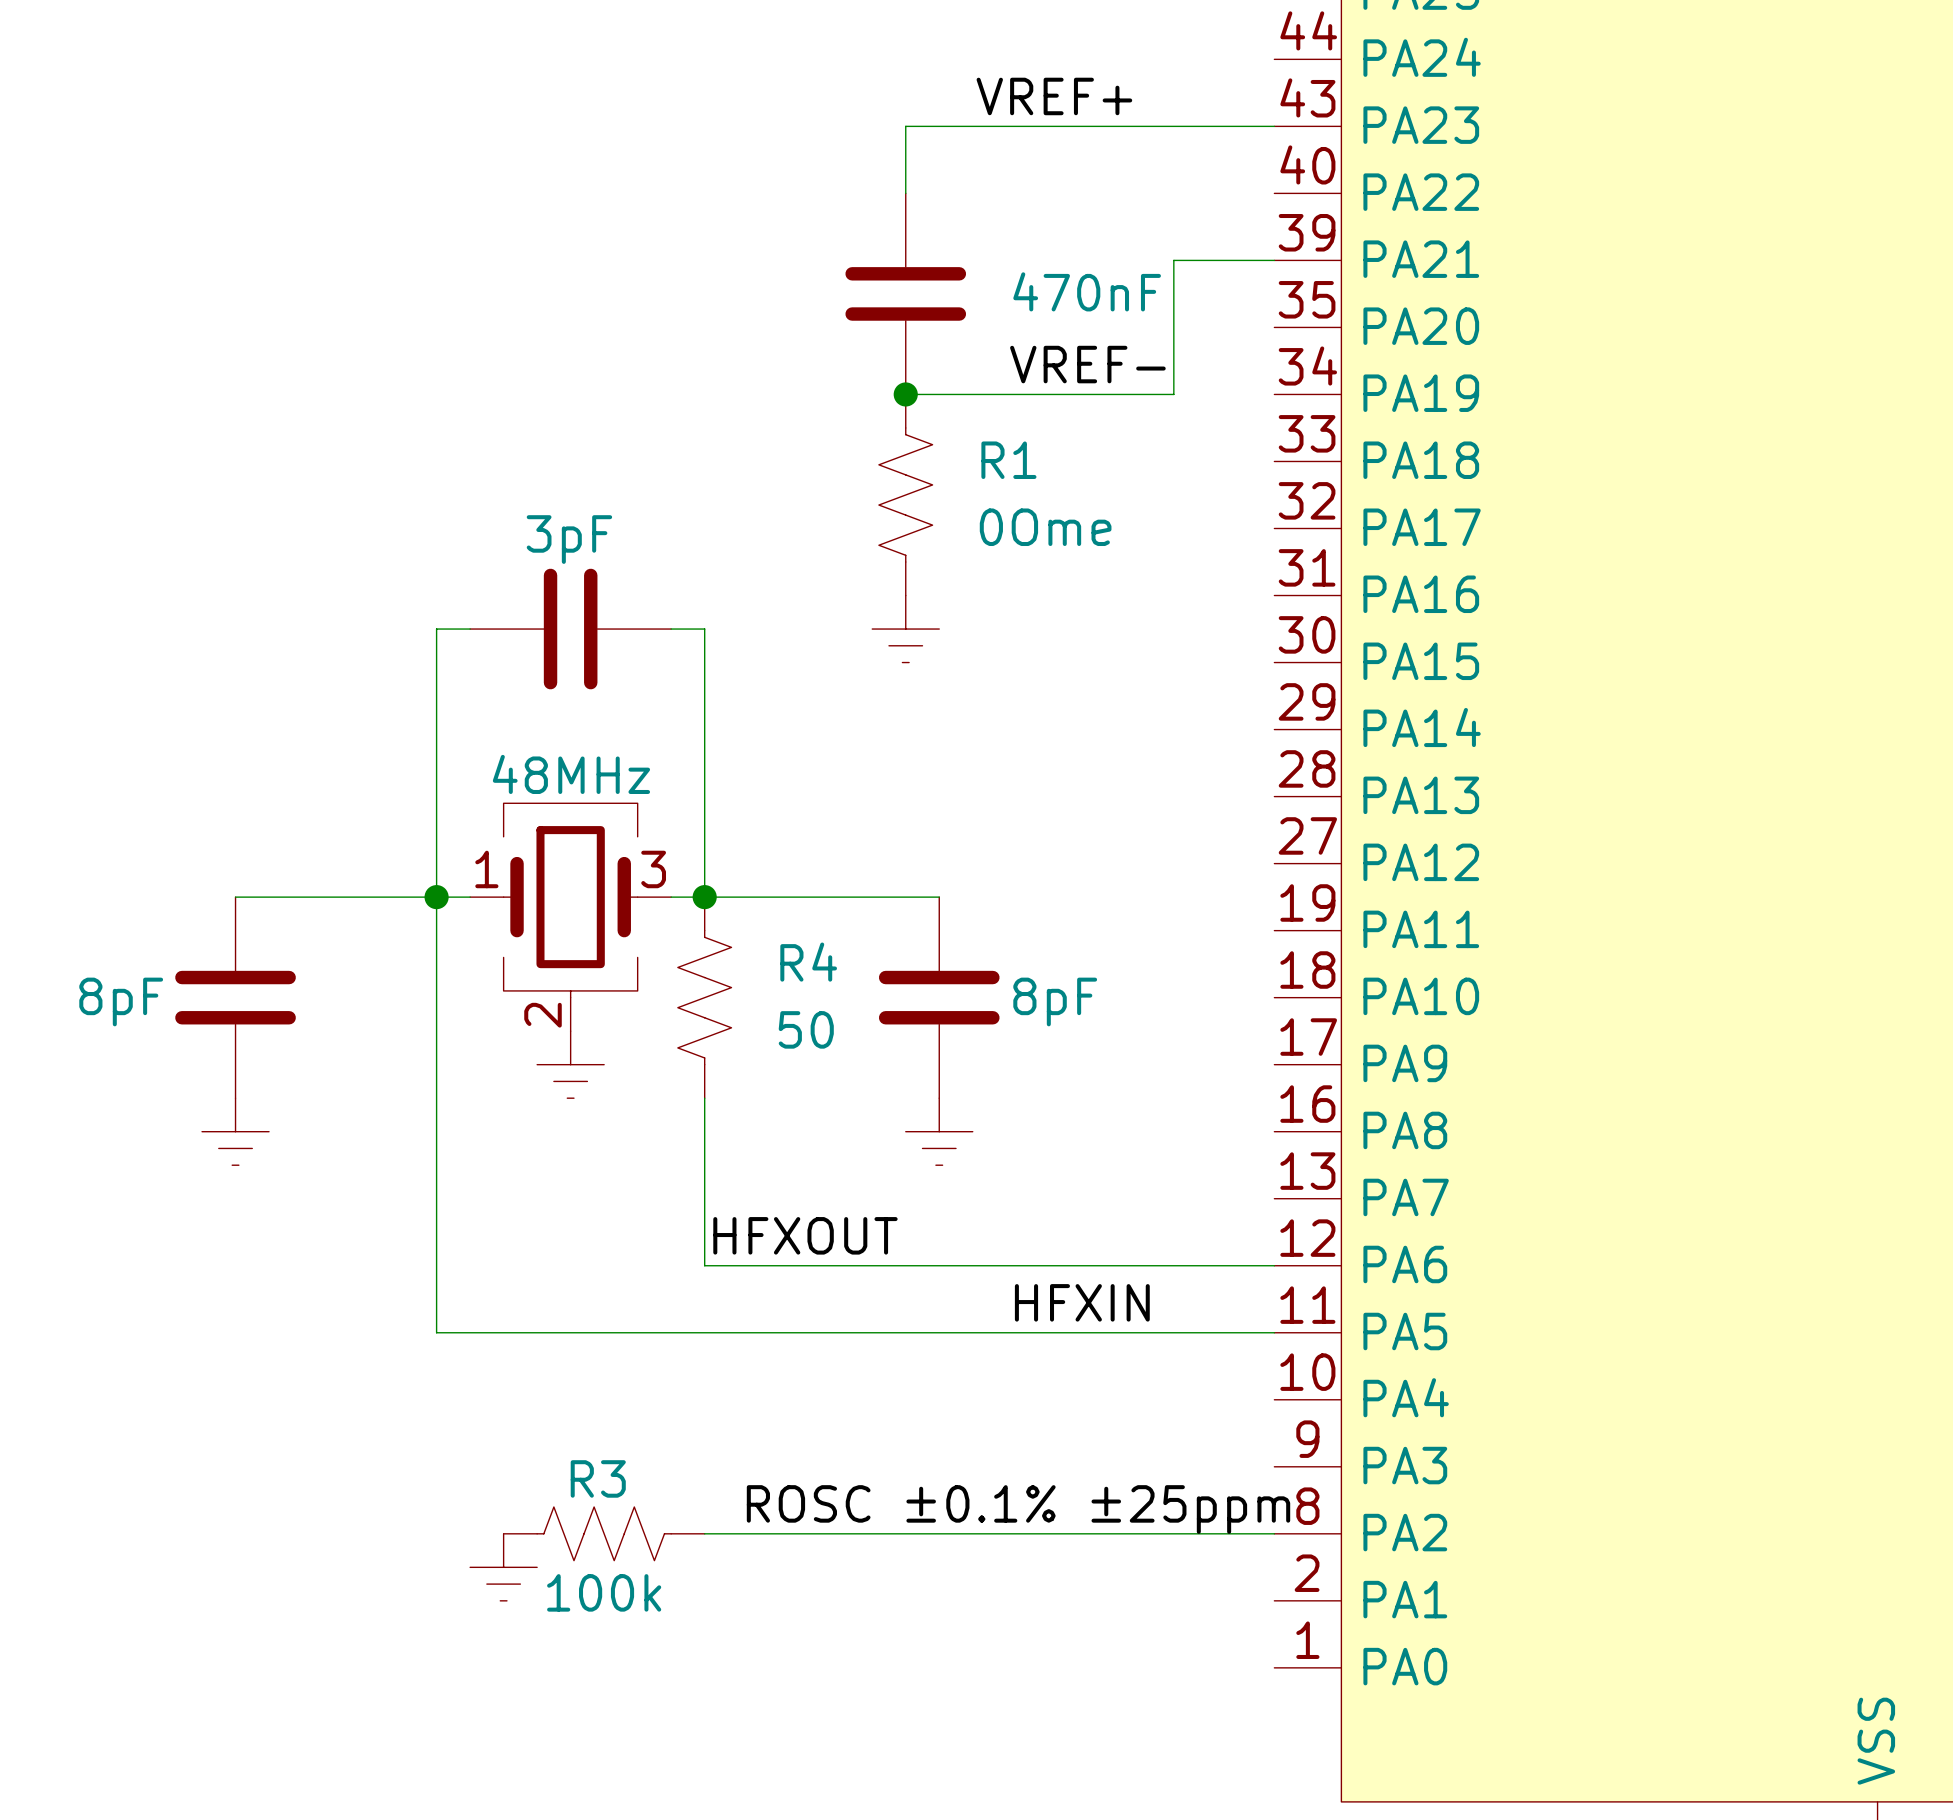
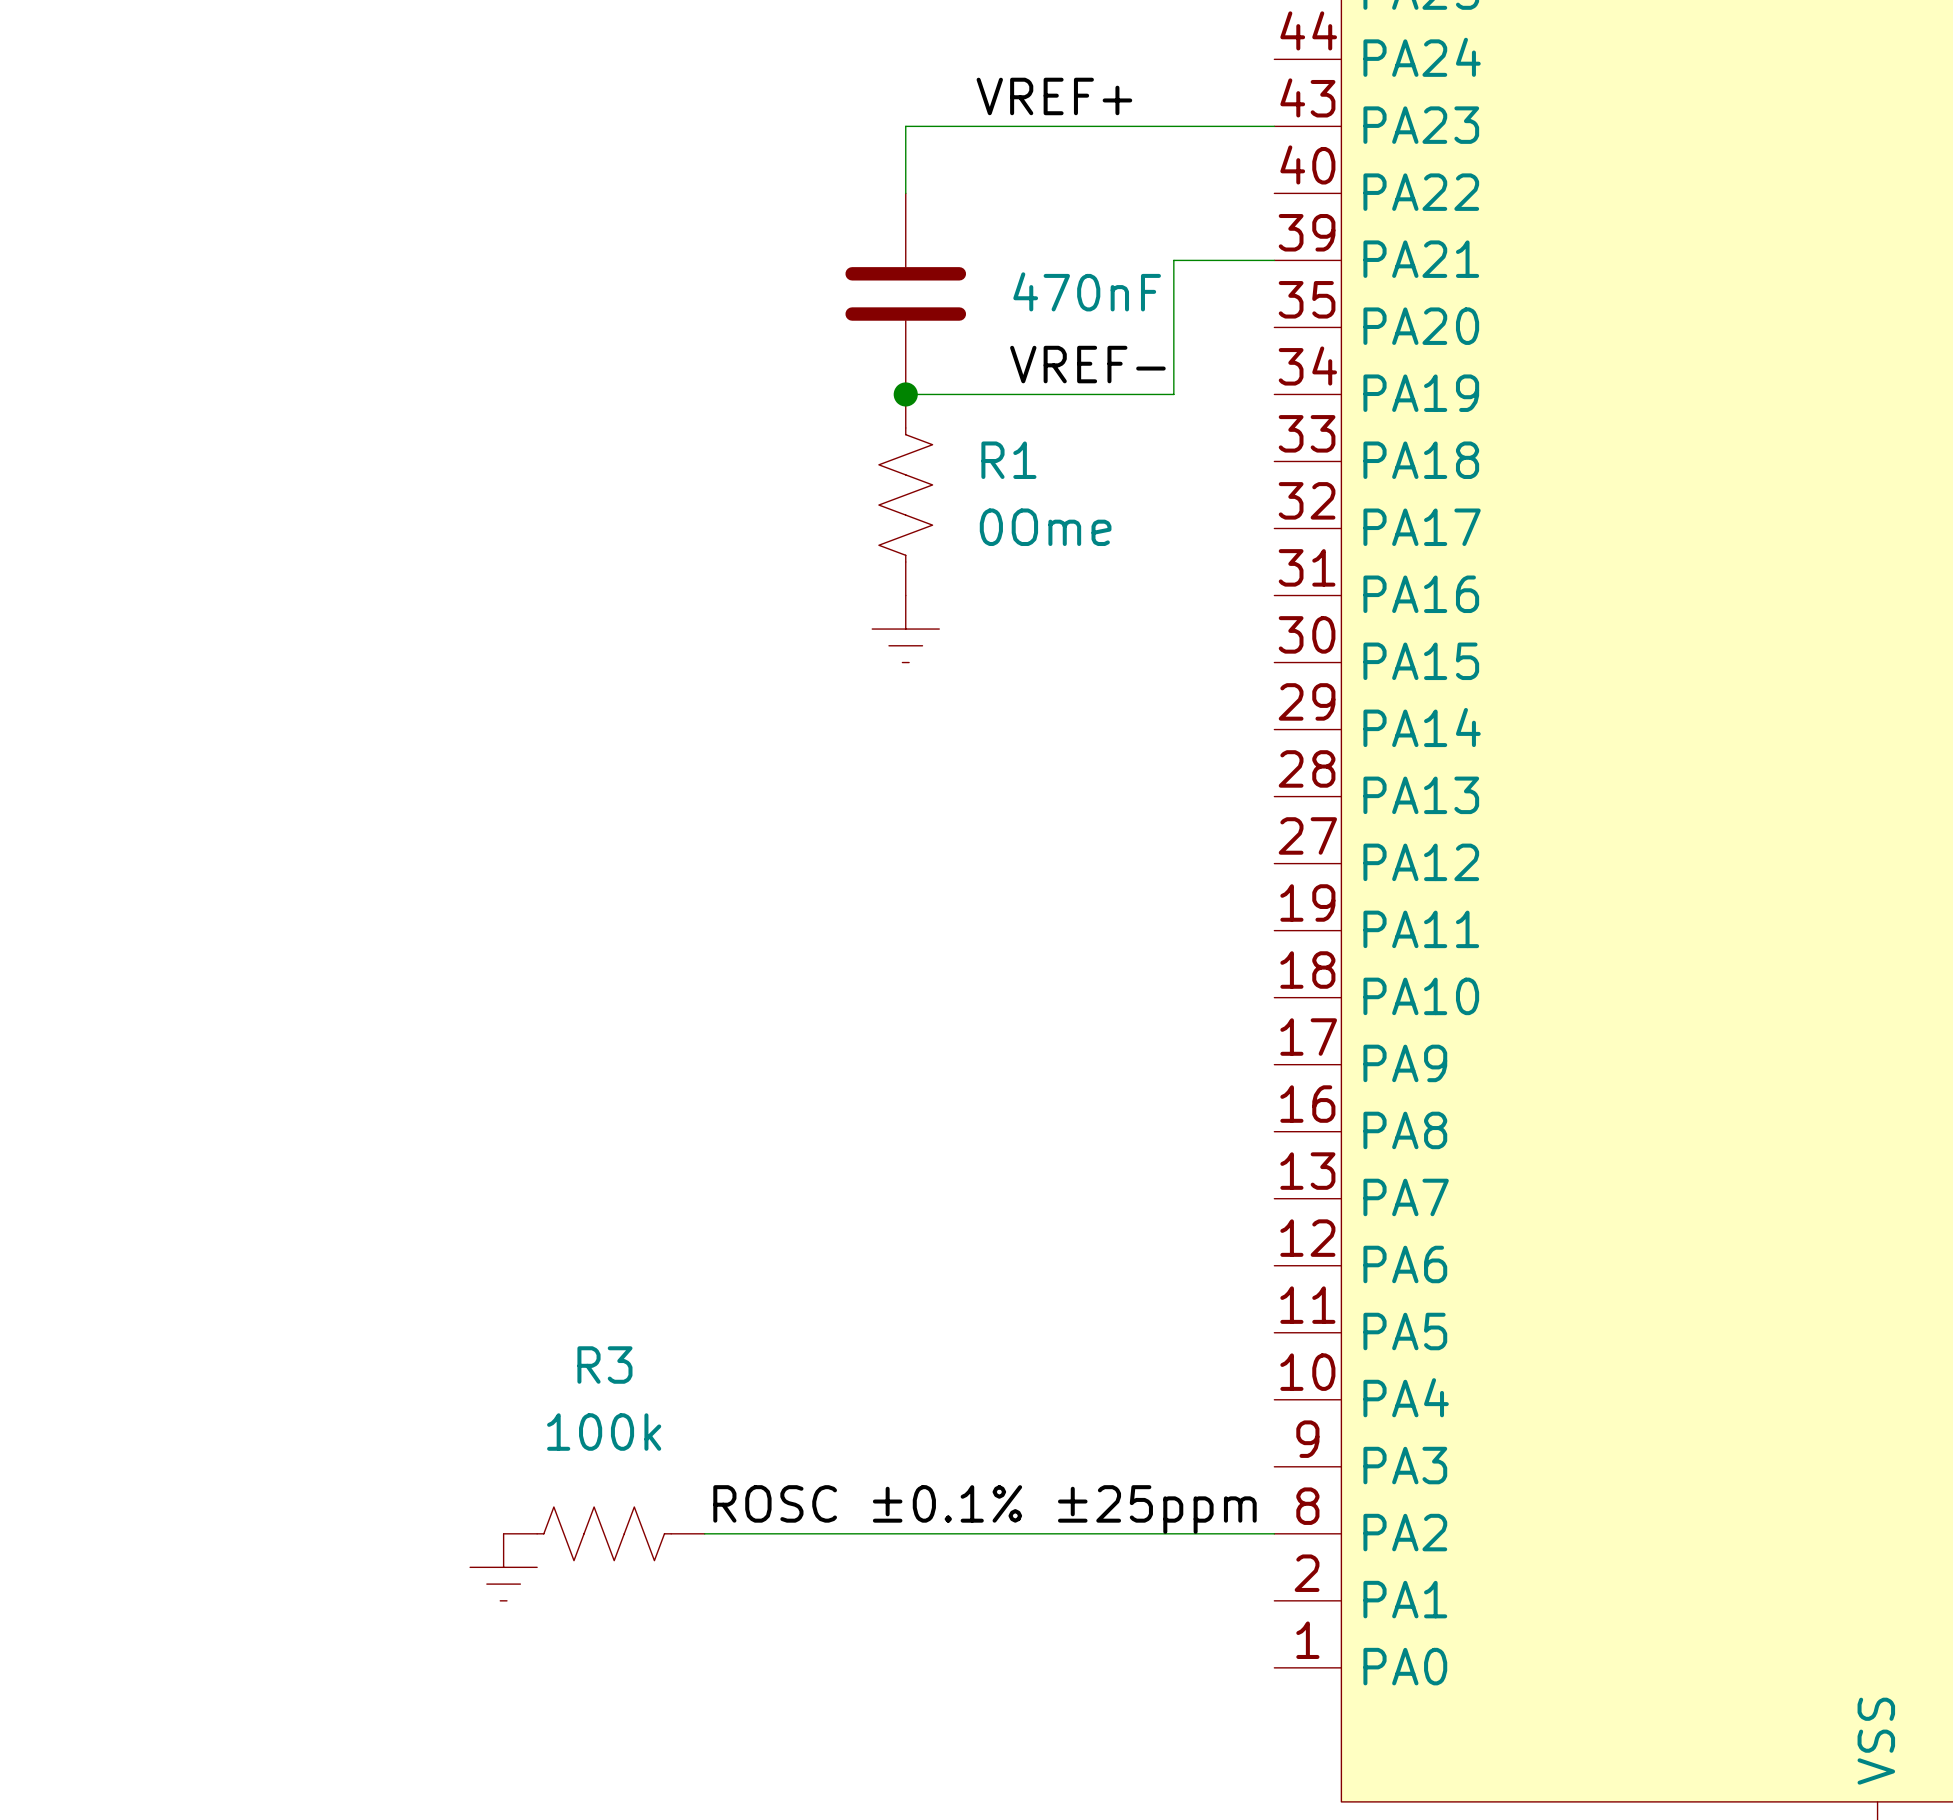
wire: (470, 629) (436, 629) (436, 1332) (1274, 1332) -> none
part: 3pF (570, 629) -> none
wire: (671, 629) (704, 629) (704, 897) -> none
wire: (235, 897) (470, 897) -> none
junction: (436, 897) -> none
wire: (671, 897) (939, 897) -> none
junction: (704, 897) -> none
part: 48MHz (570, 917) -> none
part: 8pF (235, 997) -> none
R4: 50 (704, 997) -> none
part: 8pF (939, 997) -> none
power symbol: (570, 1064) -> none
wire: (704, 1098) (704, 1265) (1274, 1265) -> none
power symbol: (235, 1131) -> none
power symbol: (939, 1131) -> none
label: HFXOUT (805, 1235) -> none
label: HFXIN (1082, 1302) -> none
R3 name position: R3 (598, 1478) -> R3 (604, 1365)
label position: ROSC ±0.1% ±25ppm (1018, 1509) -> ROSC ±0.1% ±25ppm (984, 1509)
R3 value position: 100k (604, 1592) -> 100k (604, 1432)

